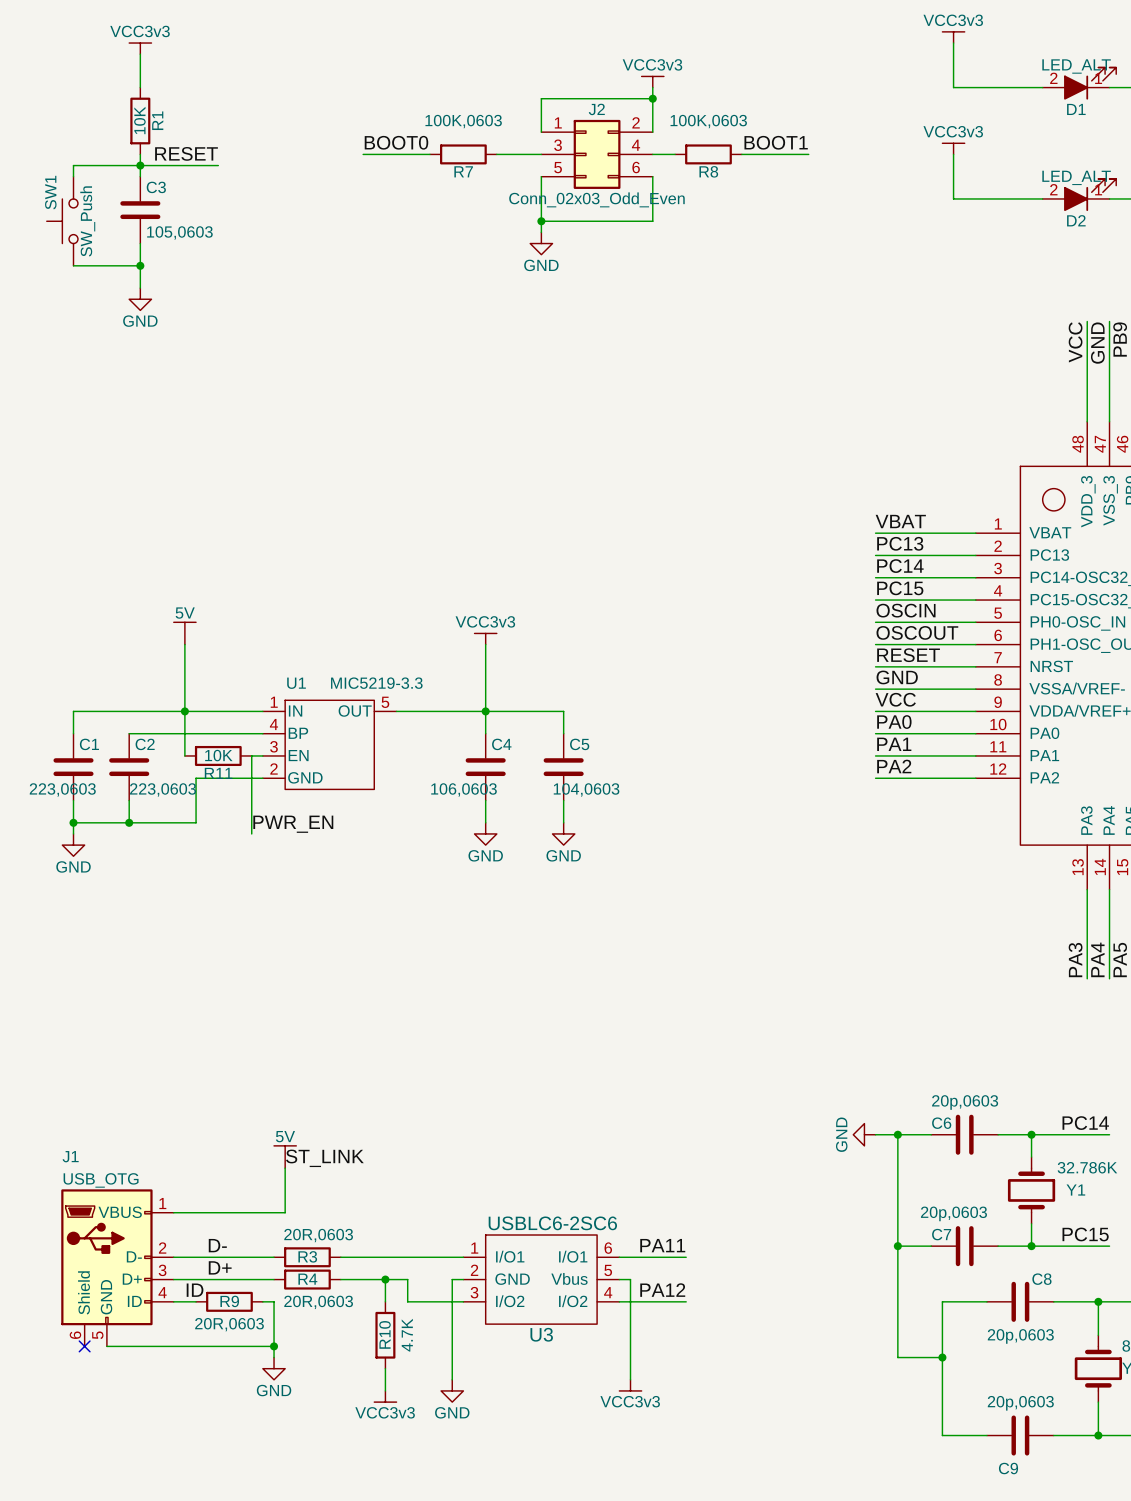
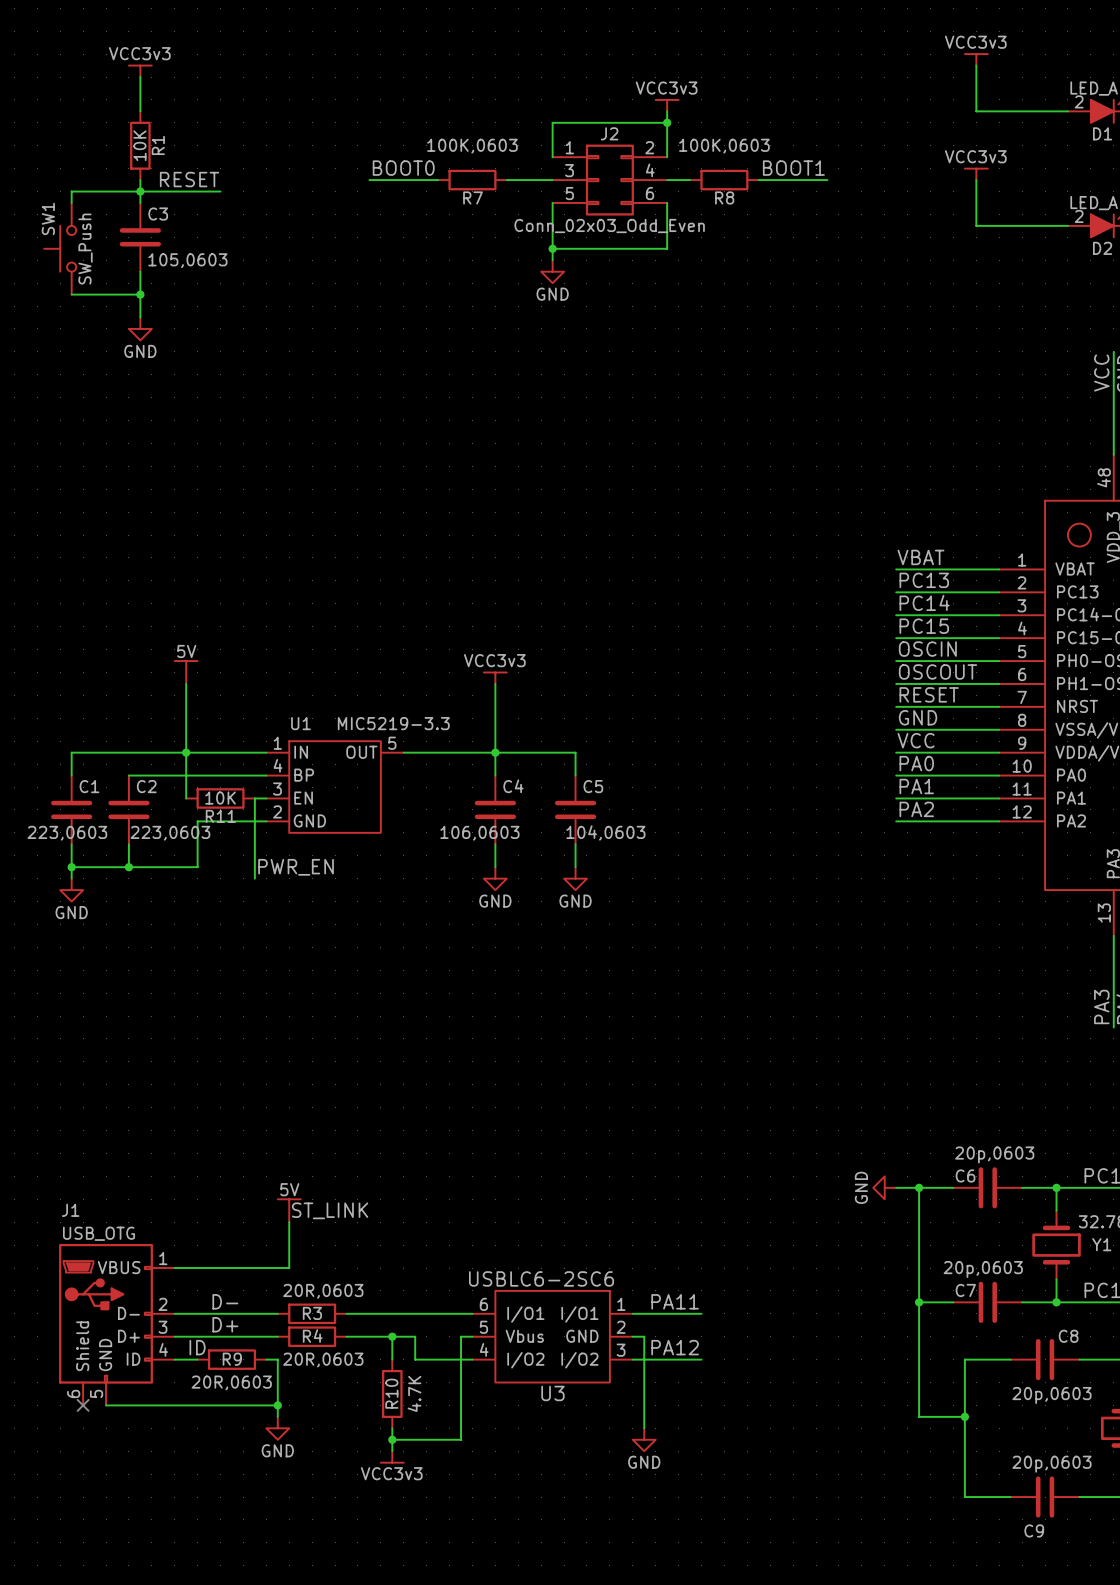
U3 flip: as is (541, 1279) -> left-right (552, 1336)
wire: none -> (392, 1439) (461, 1439)
junction: none -> (392, 1439)
power symbol: VCC3v3 (630, 1385) -> GND (644, 1439)
power symbol: GND (452, 1390) -> none

